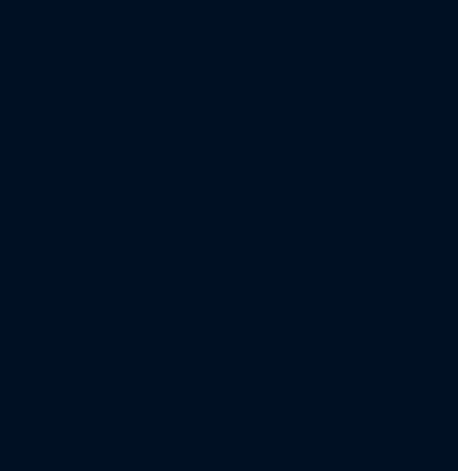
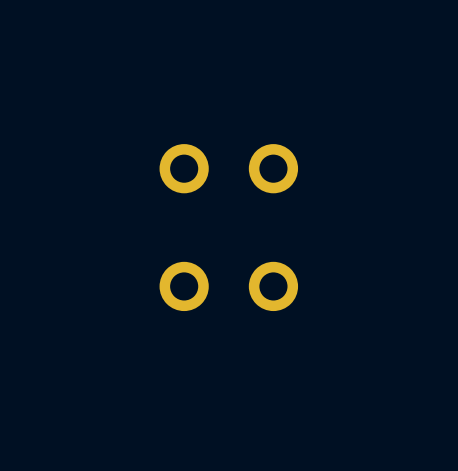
part: none -> (228, 168)
part: none -> (228, 286)

